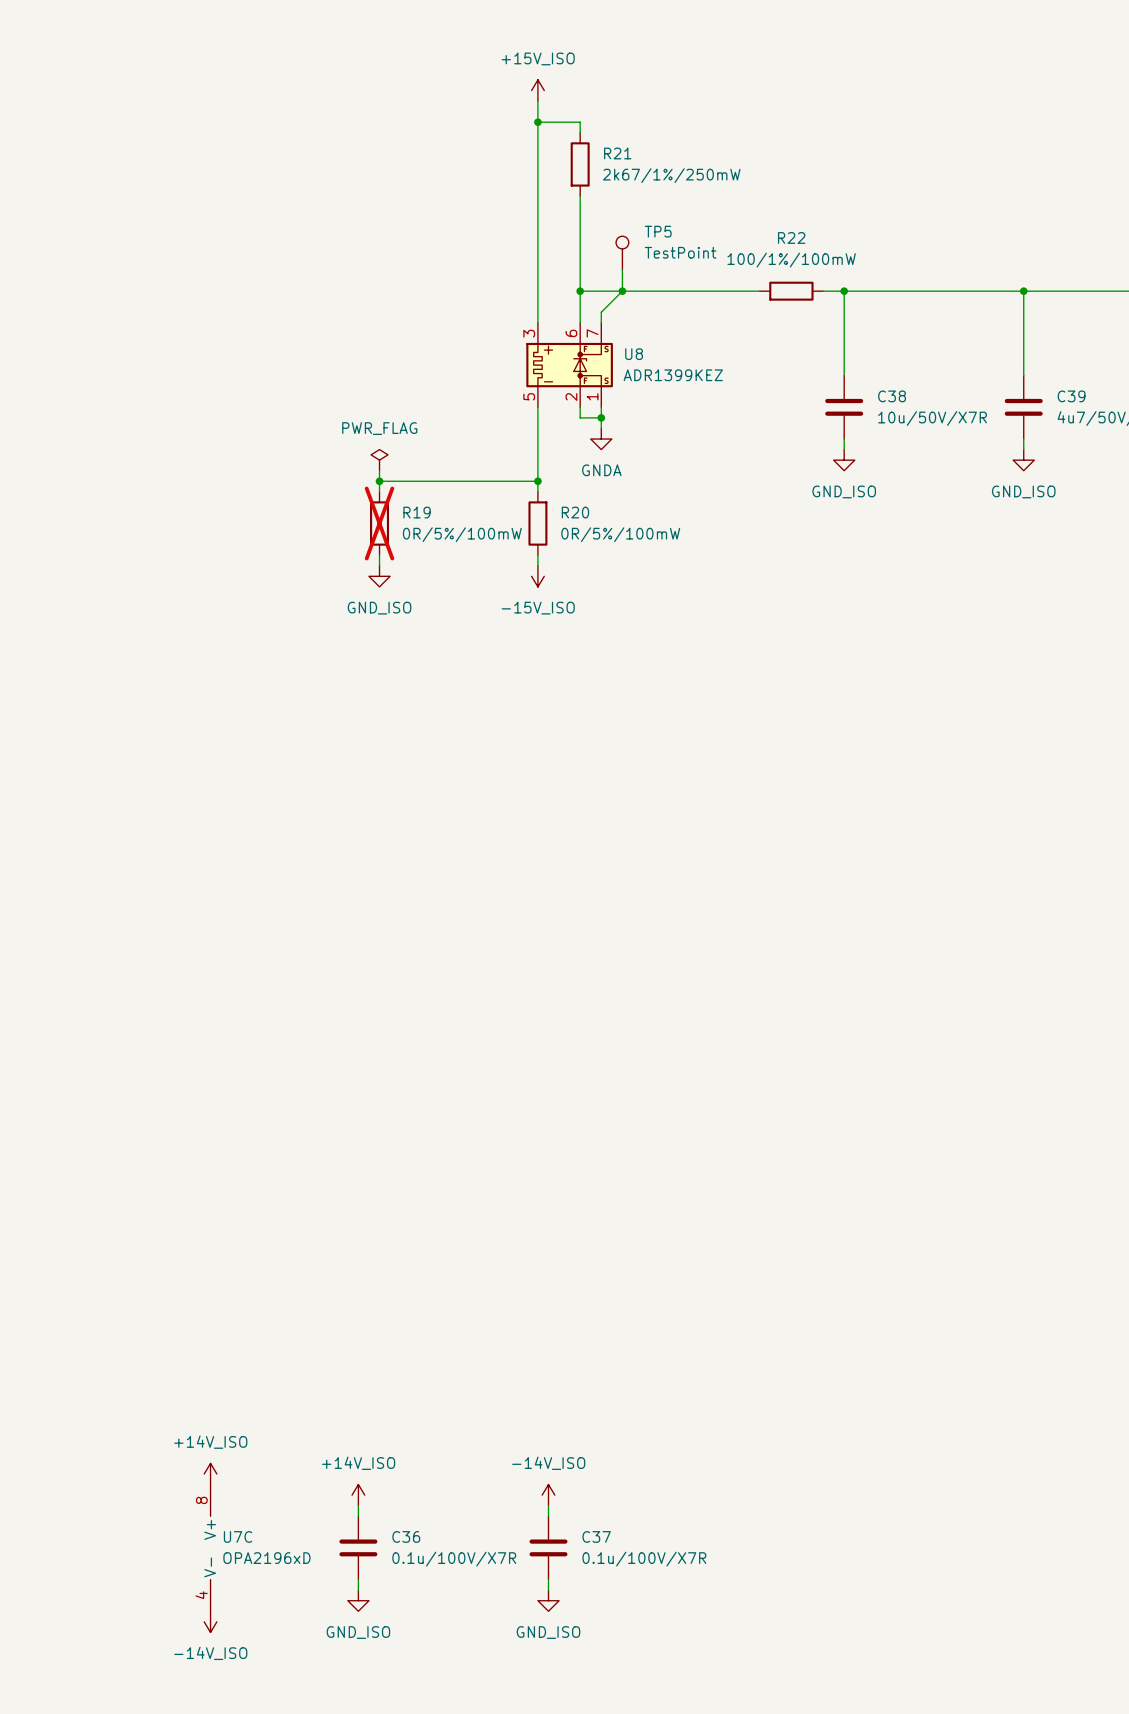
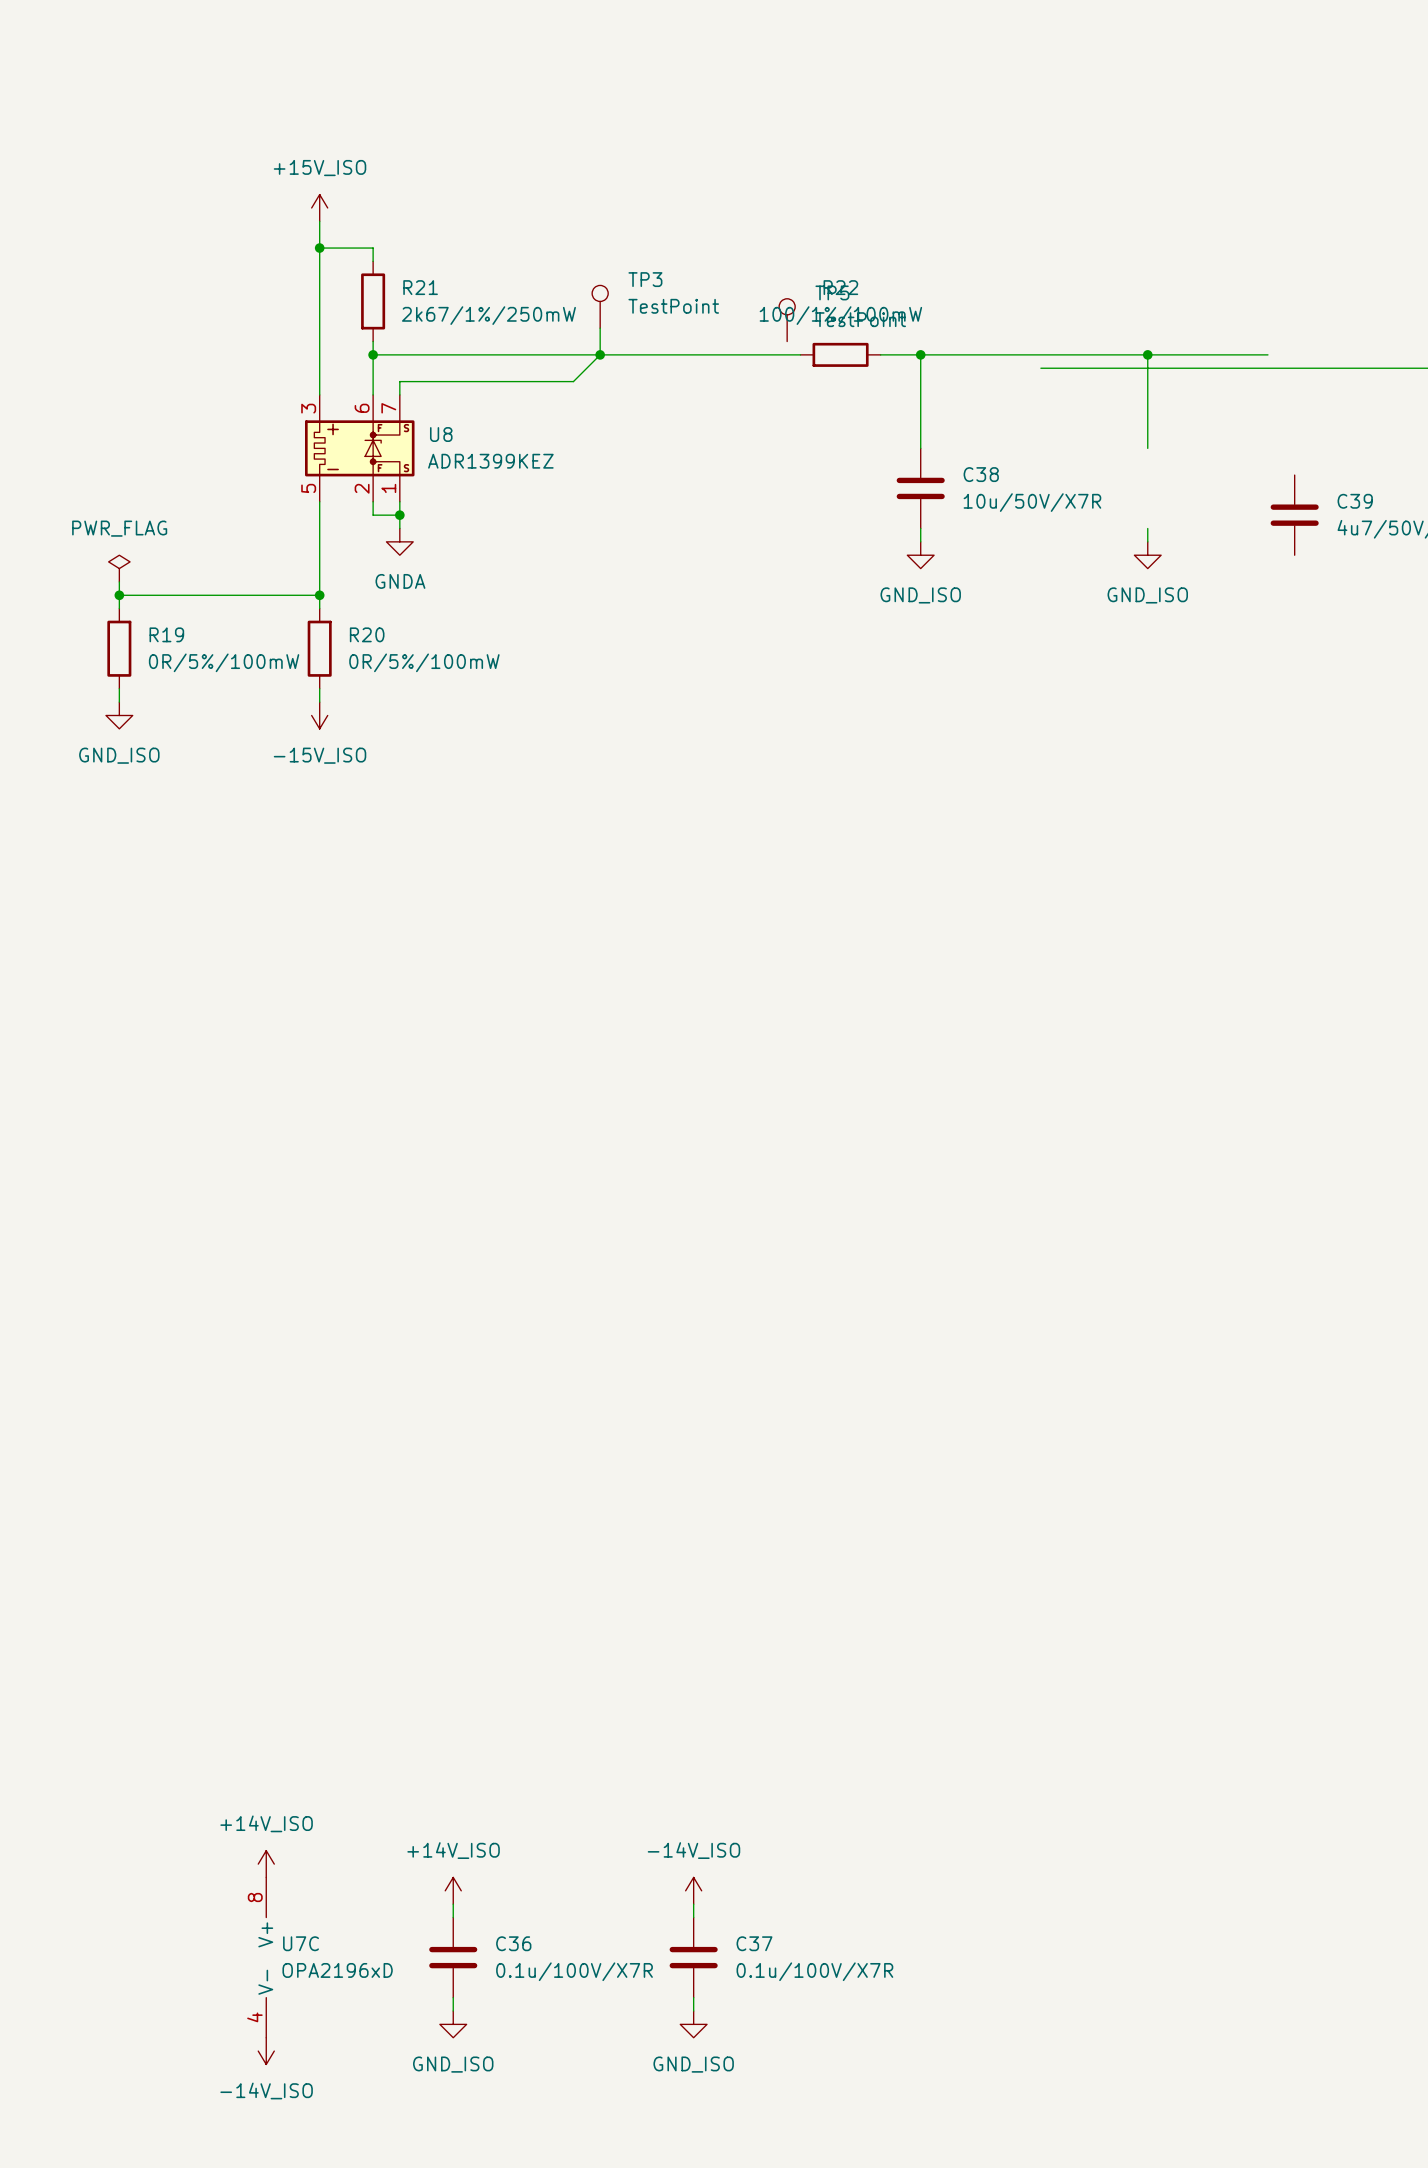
power symbol: +15V_ISO (537, 90) -> none
wire: (537, 101) (537, 322) -> none
wire: (537, 122) (580, 122) (580, 132) -> none
junction: (537, 122) -> none
power symbol: none -> +15V_ISO (319, 207)
R21 position: (580, 164) -> (373, 301)
wire: none -> (319, 221) (319, 394)
wire: none -> (319, 248) (373, 248) (373, 261)
junction: none -> (319, 248)
wire: (580, 196) (580, 322) -> none
TP3: none -> TestPoint (600, 306)
wire: none -> (600, 328) (600, 354) (573, 381) (399, 381) (399, 394)
wire: none -> (373, 341) (373, 394)
wire: (622, 270) (622, 291) (601, 312) (601, 322) -> none
wire: none -> (373, 354) (800, 354)
junction: none -> (373, 354)
junction: none -> (600, 354)
wire: none -> (880, 354) (1267, 354)
wire: none -> (920, 354) (920, 448)
junction: none -> (920, 354)
wire: none -> (1147, 354) (1147, 448)
junction: none -> (1147, 354)
wire: (580, 291) (759, 291) -> none
junction: (580, 291) -> none
junction: (622, 291) -> none
R22 position: (791, 291) -> (840, 354)
wire: (844, 291) (844, 375) -> none
junction: (844, 291) -> none
wire: (1023, 291) (1023, 375) -> none
junction: (1023, 291) -> none
U8 position: (569, 365) -> (359, 448)
wire: none -> (319, 501) (319, 608)
wire: none -> (373, 501) (373, 515) (399, 515)
junction: none -> (399, 515)
wire: (537, 407) (537, 491) -> none
wire: (580, 407) (580, 417) (601, 417) -> none
wire: (601, 407) (601, 428) -> none
C38 position: (844, 407) -> (920, 488)
junction: (601, 417) -> none
power symbol: none -> GNDA (399, 541)
power symbol: GNDA (601, 439) -> none
power symbol: none -> GND_ISO (920, 555)
wire: (844, 439) (844, 449) -> (920, 528) (920, 541)
power symbol: none -> GND_ISO (1147, 555)
wire: (1023, 439) (1023, 449) -> (1147, 528) (1147, 541)
power symbol: none -> PWR_FLAG (119, 568)
wire: none -> (119, 581) (119, 608)
power symbol: PWR_FLAG (379, 460) -> none
power symbol: GND_ISO (844, 460) -> none
power symbol: GND_ISO (1023, 460) -> none
wire: none -> (119, 595) (319, 595)
junction: none -> (119, 595)
junction: none -> (319, 595)
wire: (379, 470) (379, 491) -> (399, 501) (399, 528)
wire: (379, 481) (537, 481) -> none
junction: (379, 481) -> none
junction: (537, 481) -> none
R19 position: (379, 523) -> (119, 648)
R19 do-not-place cross: (379, 523) -> none
R20 position: (537, 523) -> (319, 648)
wire: none -> (119, 688) (119, 702)
wire: (379, 555) (379, 565) -> (319, 688) (319, 702)
wire: (537, 555) (537, 565) -> none
power symbol: none -> GND_ISO (119, 715)
power symbol: none -> -15V_ISO (319, 715)
power symbol: GND_ISO (379, 576) -> none
power symbol: -15V_ISO (537, 576) -> none

